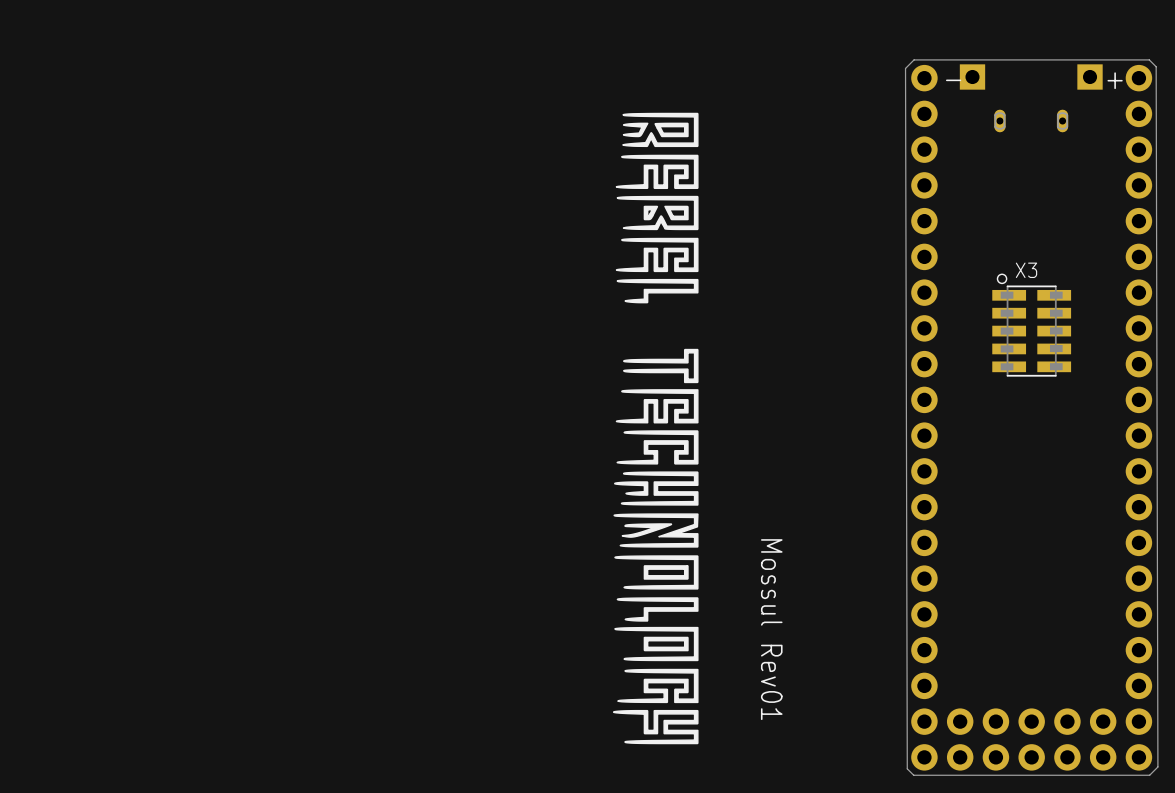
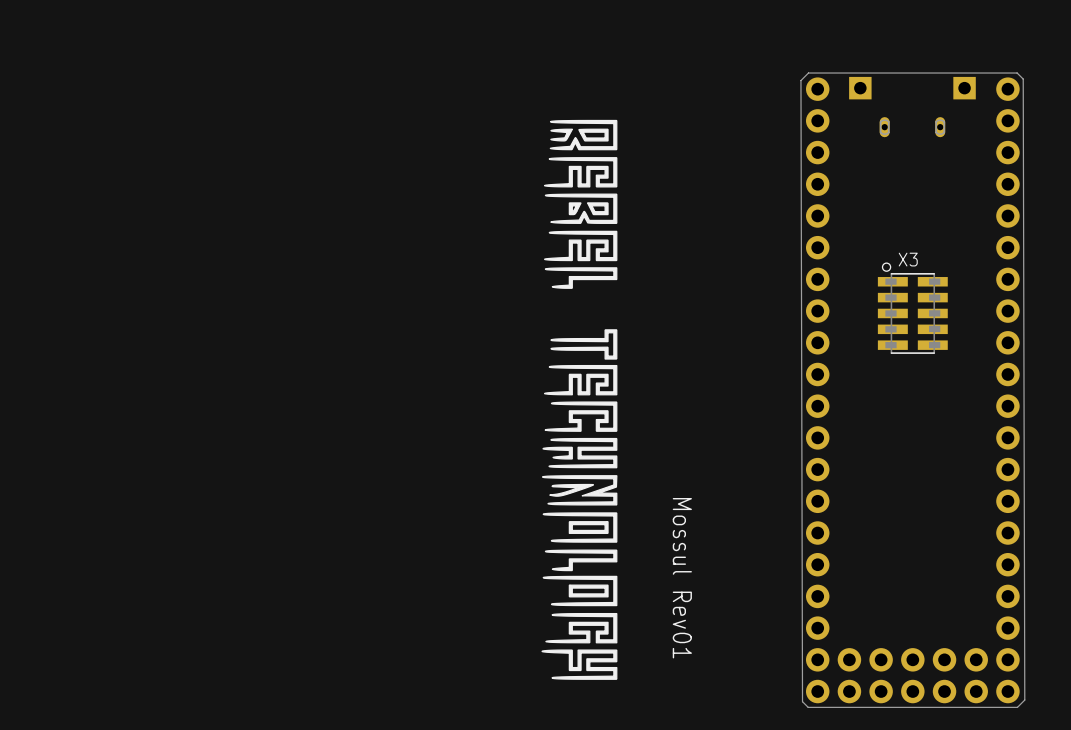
text: - (953, 80) -> none
text: + (1115, 80) -> none

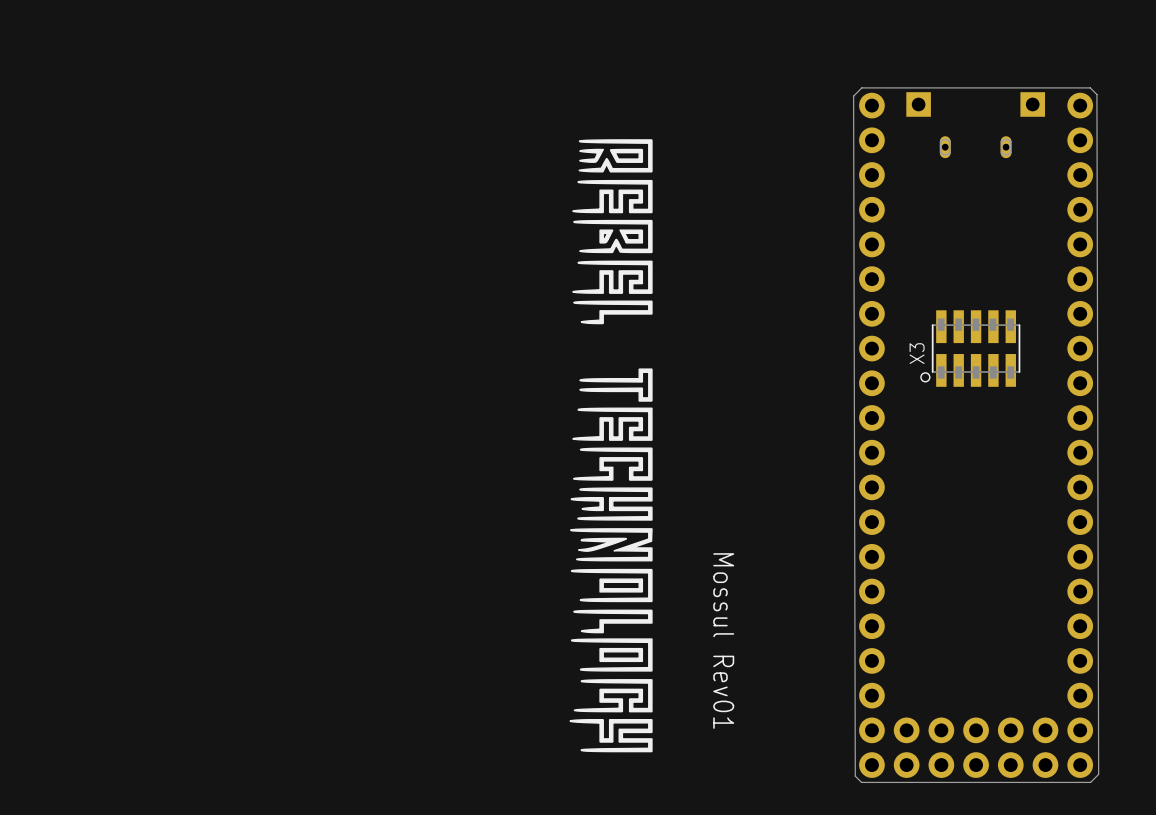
X3 rotation: 0° (912, 308) -> 90° counterclockwise (970, 348)

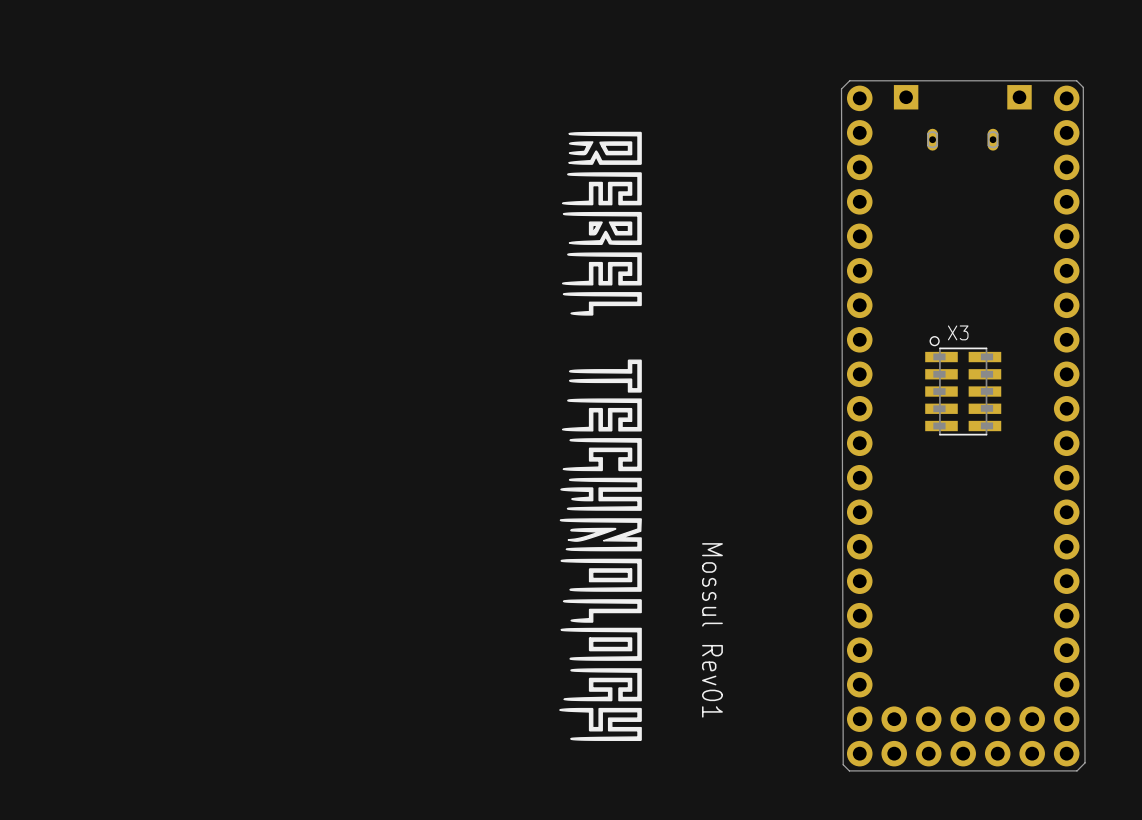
X3 rotation: 0° (970, 348) -> 90° clockwise (963, 385)

